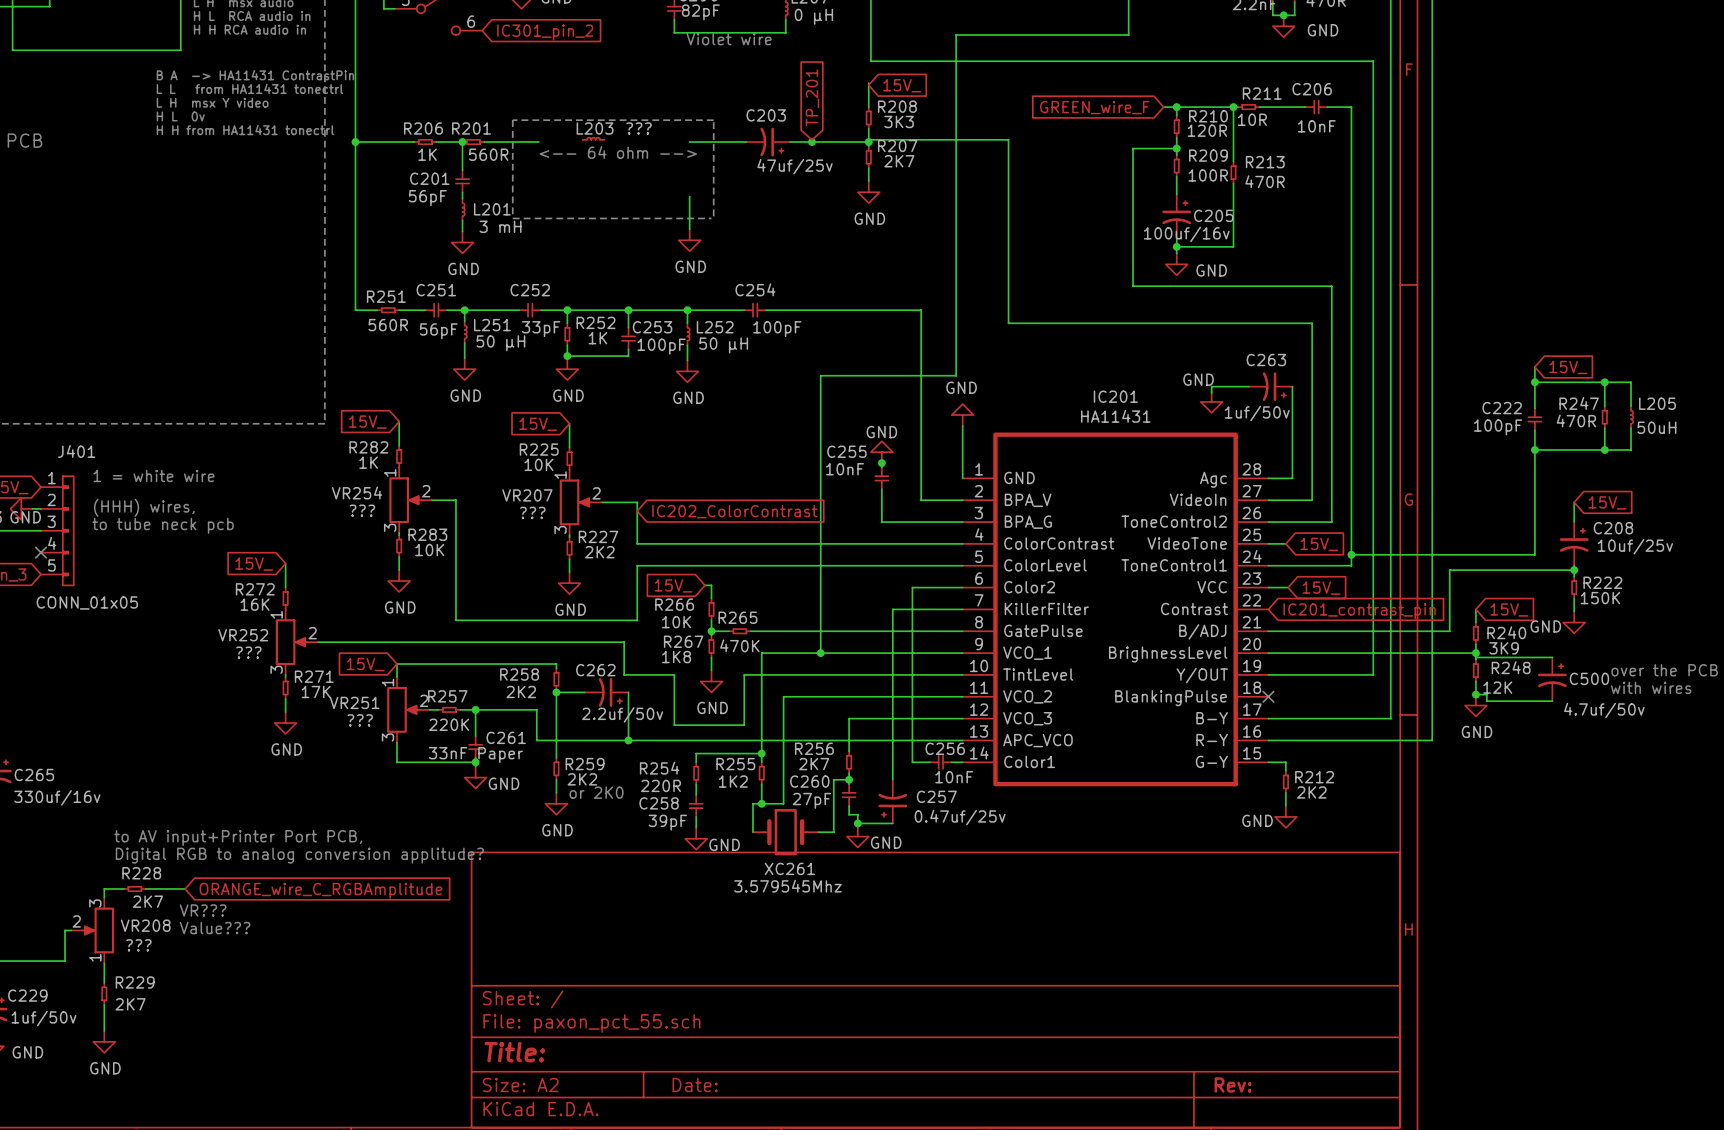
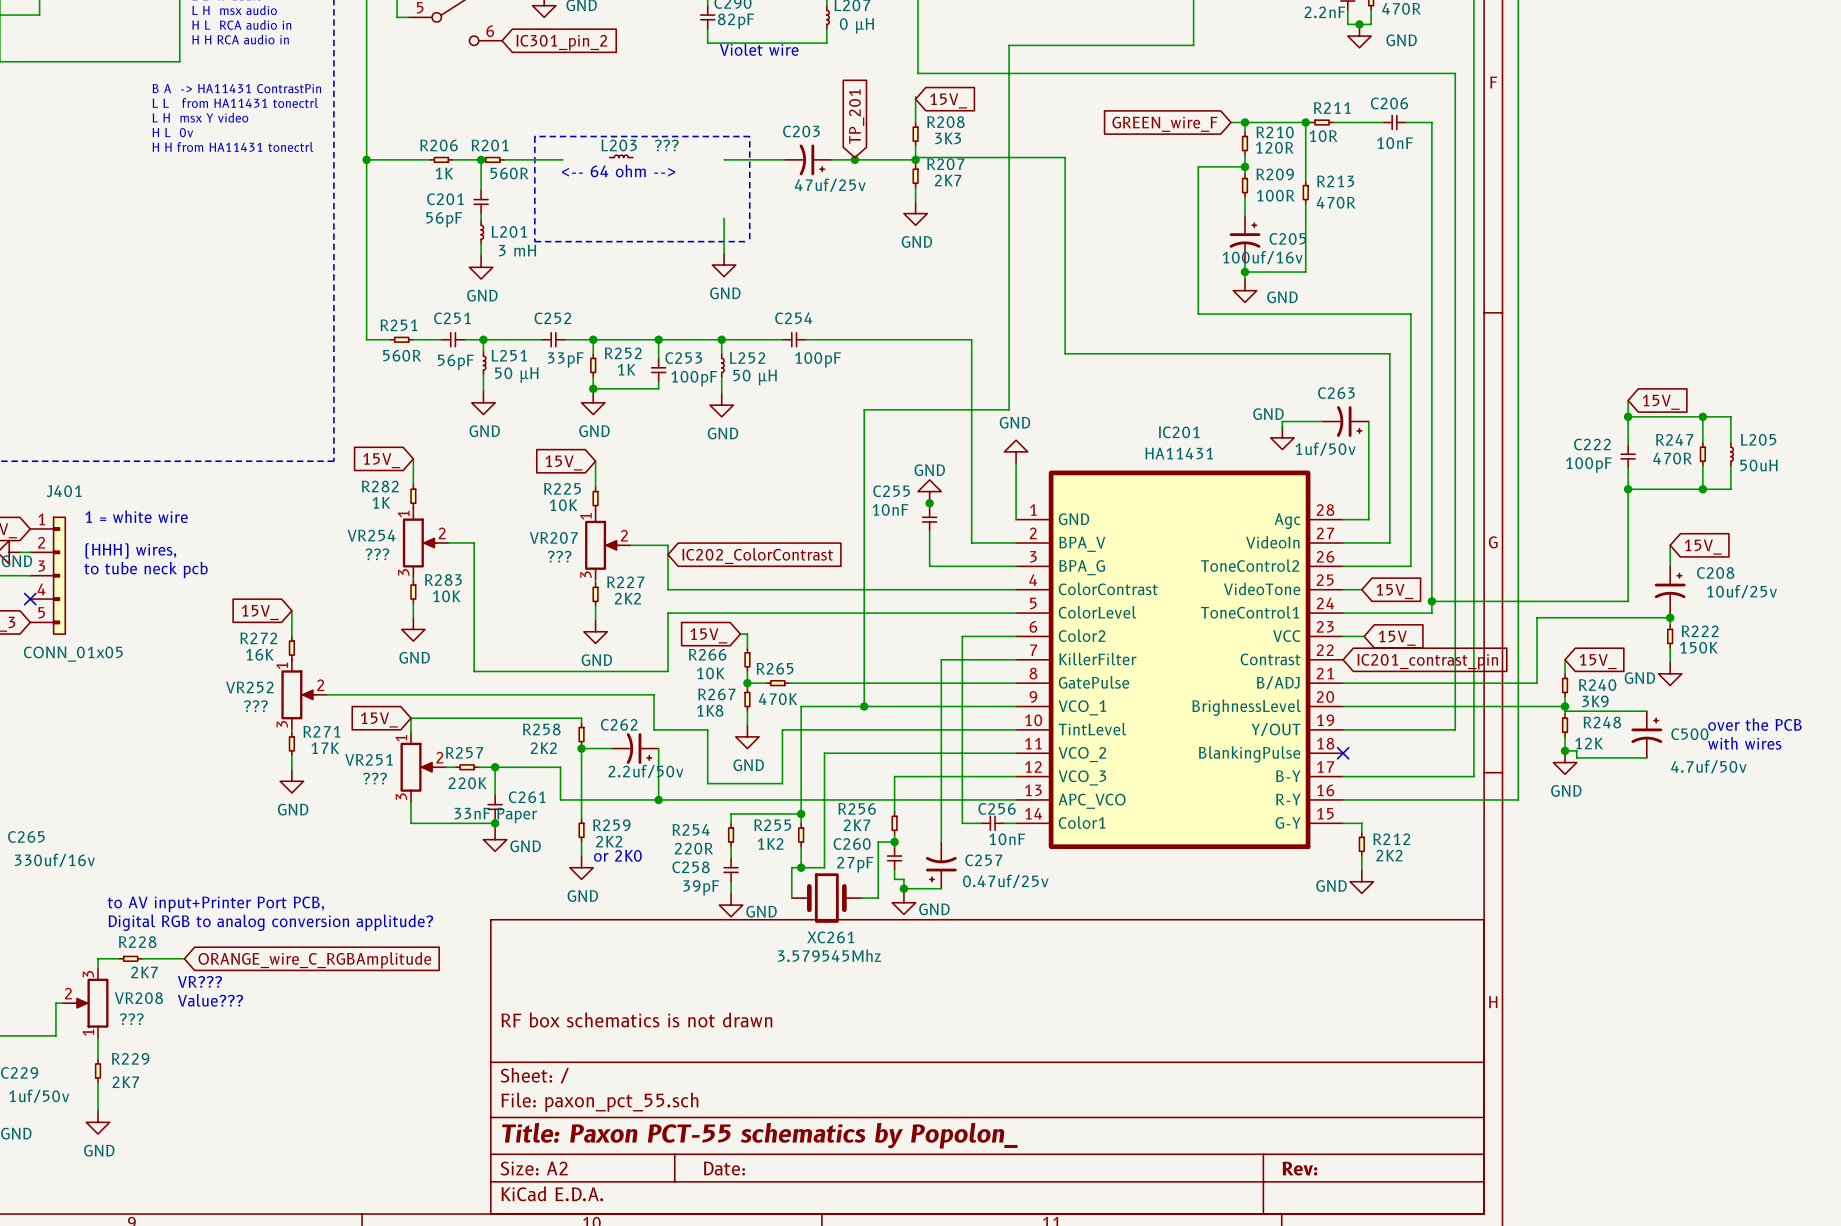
title block: none -> RF box schematics is not drawn (636, 1020)
title block: Title: (514, 1052) -> Title: Paxon PCT-55 schematics by Popolon_ (759, 1135)

